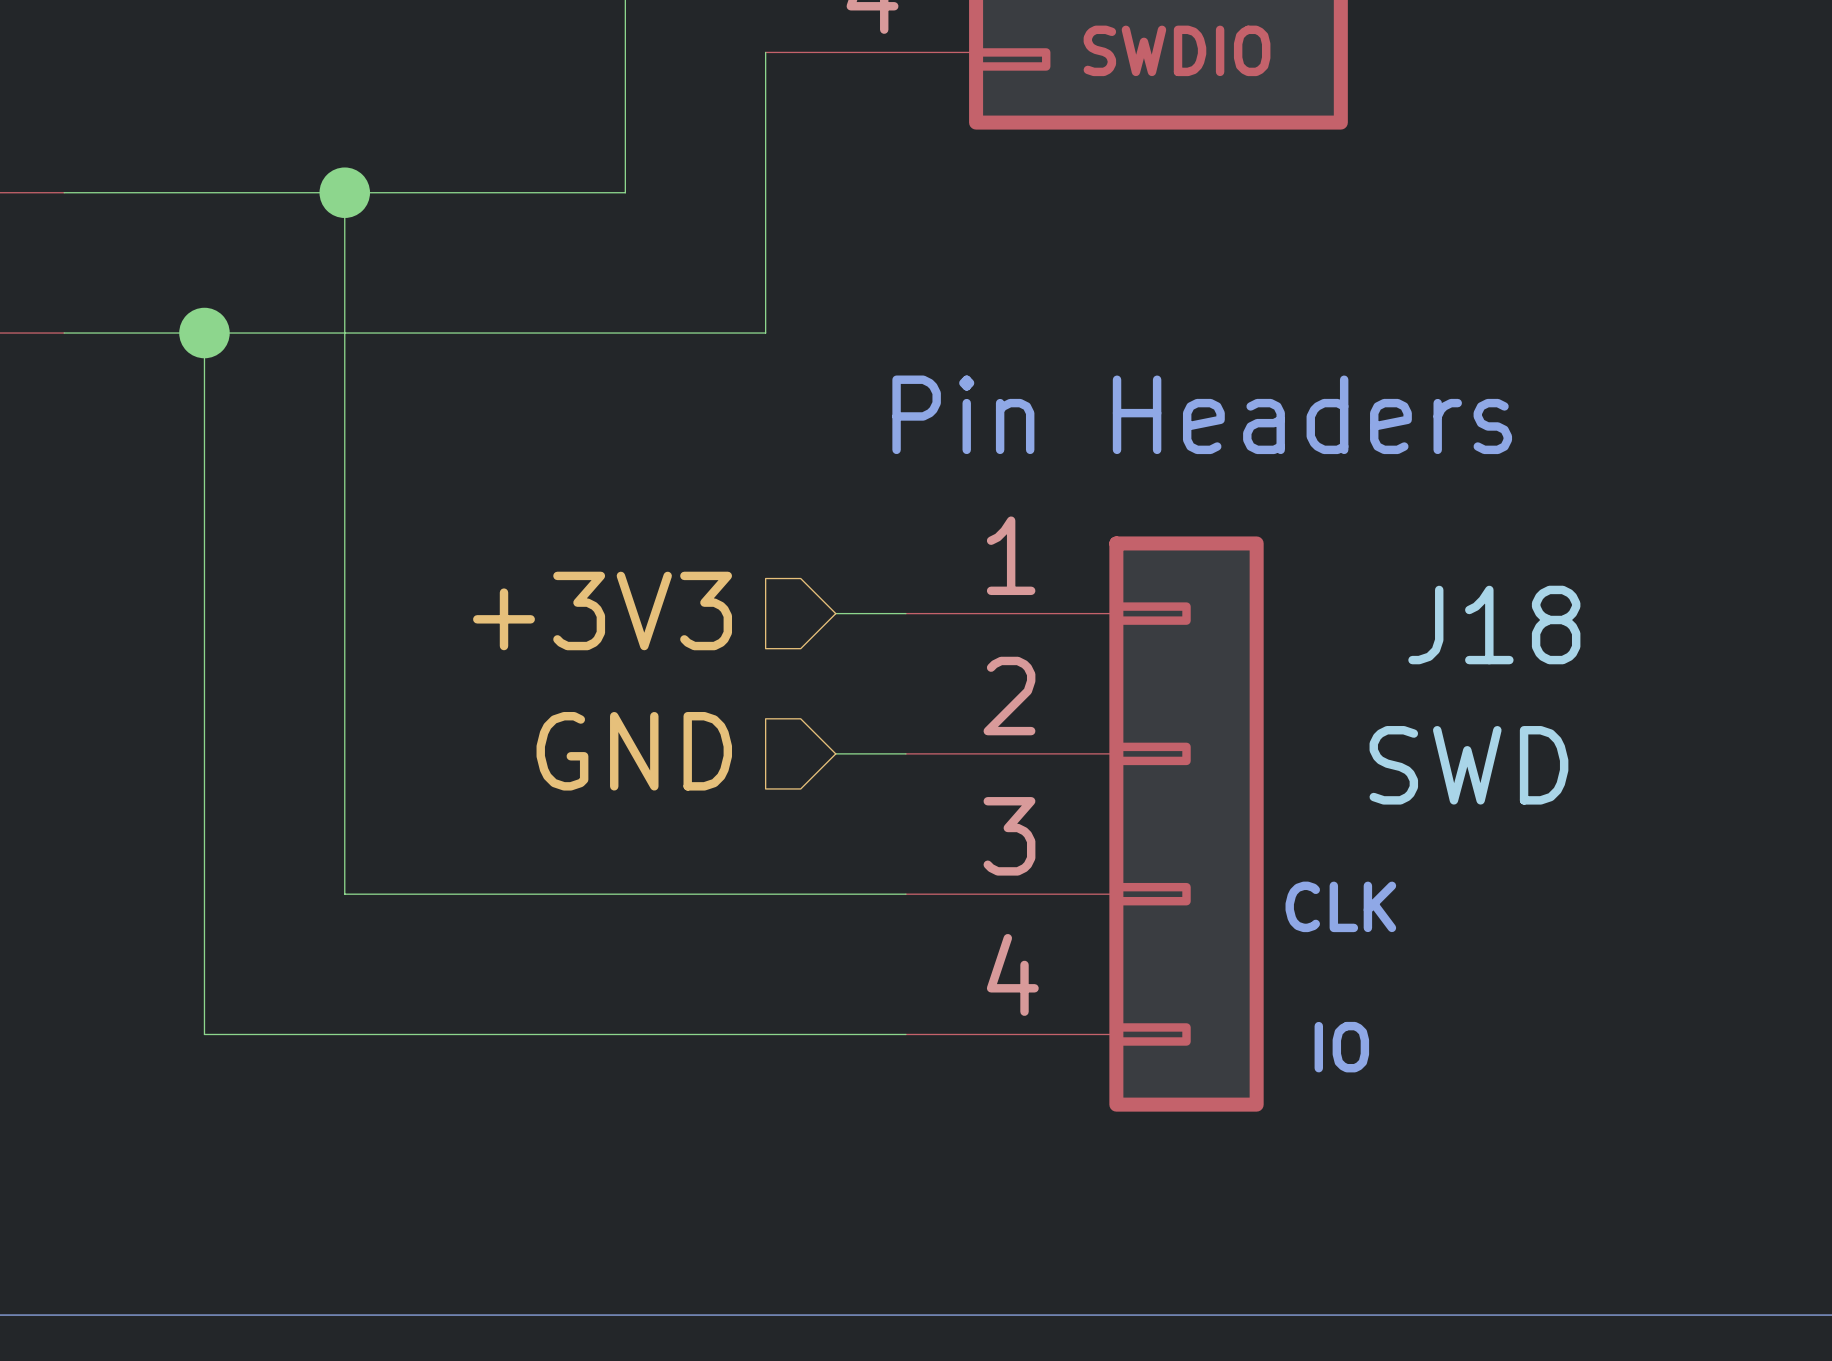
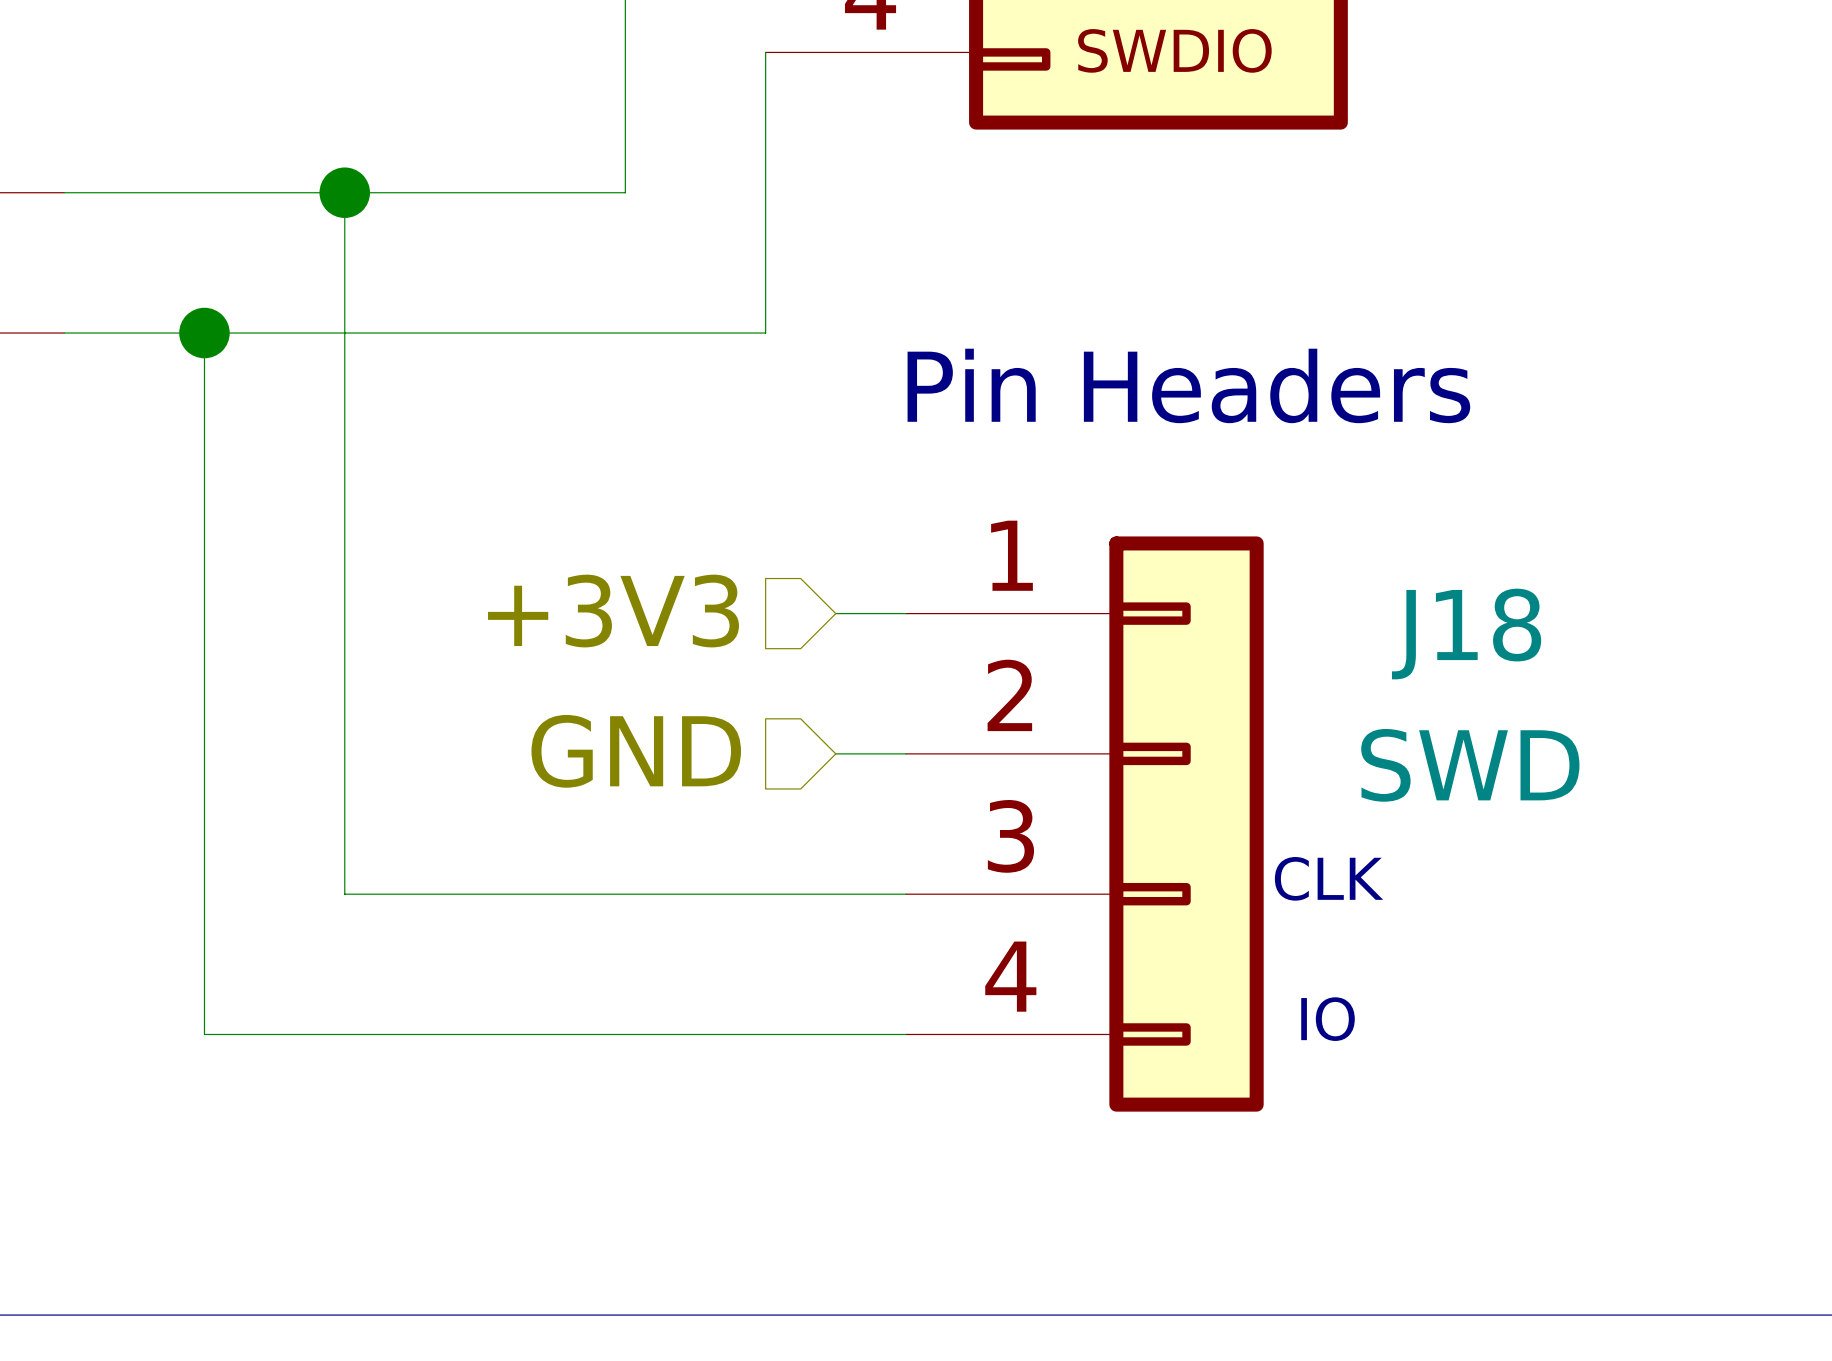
text position: Pin Headers (1202, 414) -> Pin Headers (1188, 385)
text position: CLK (1340, 906) -> CLK (1329, 878)
text position: IO (1341, 1047) -> IO (1328, 1019)

